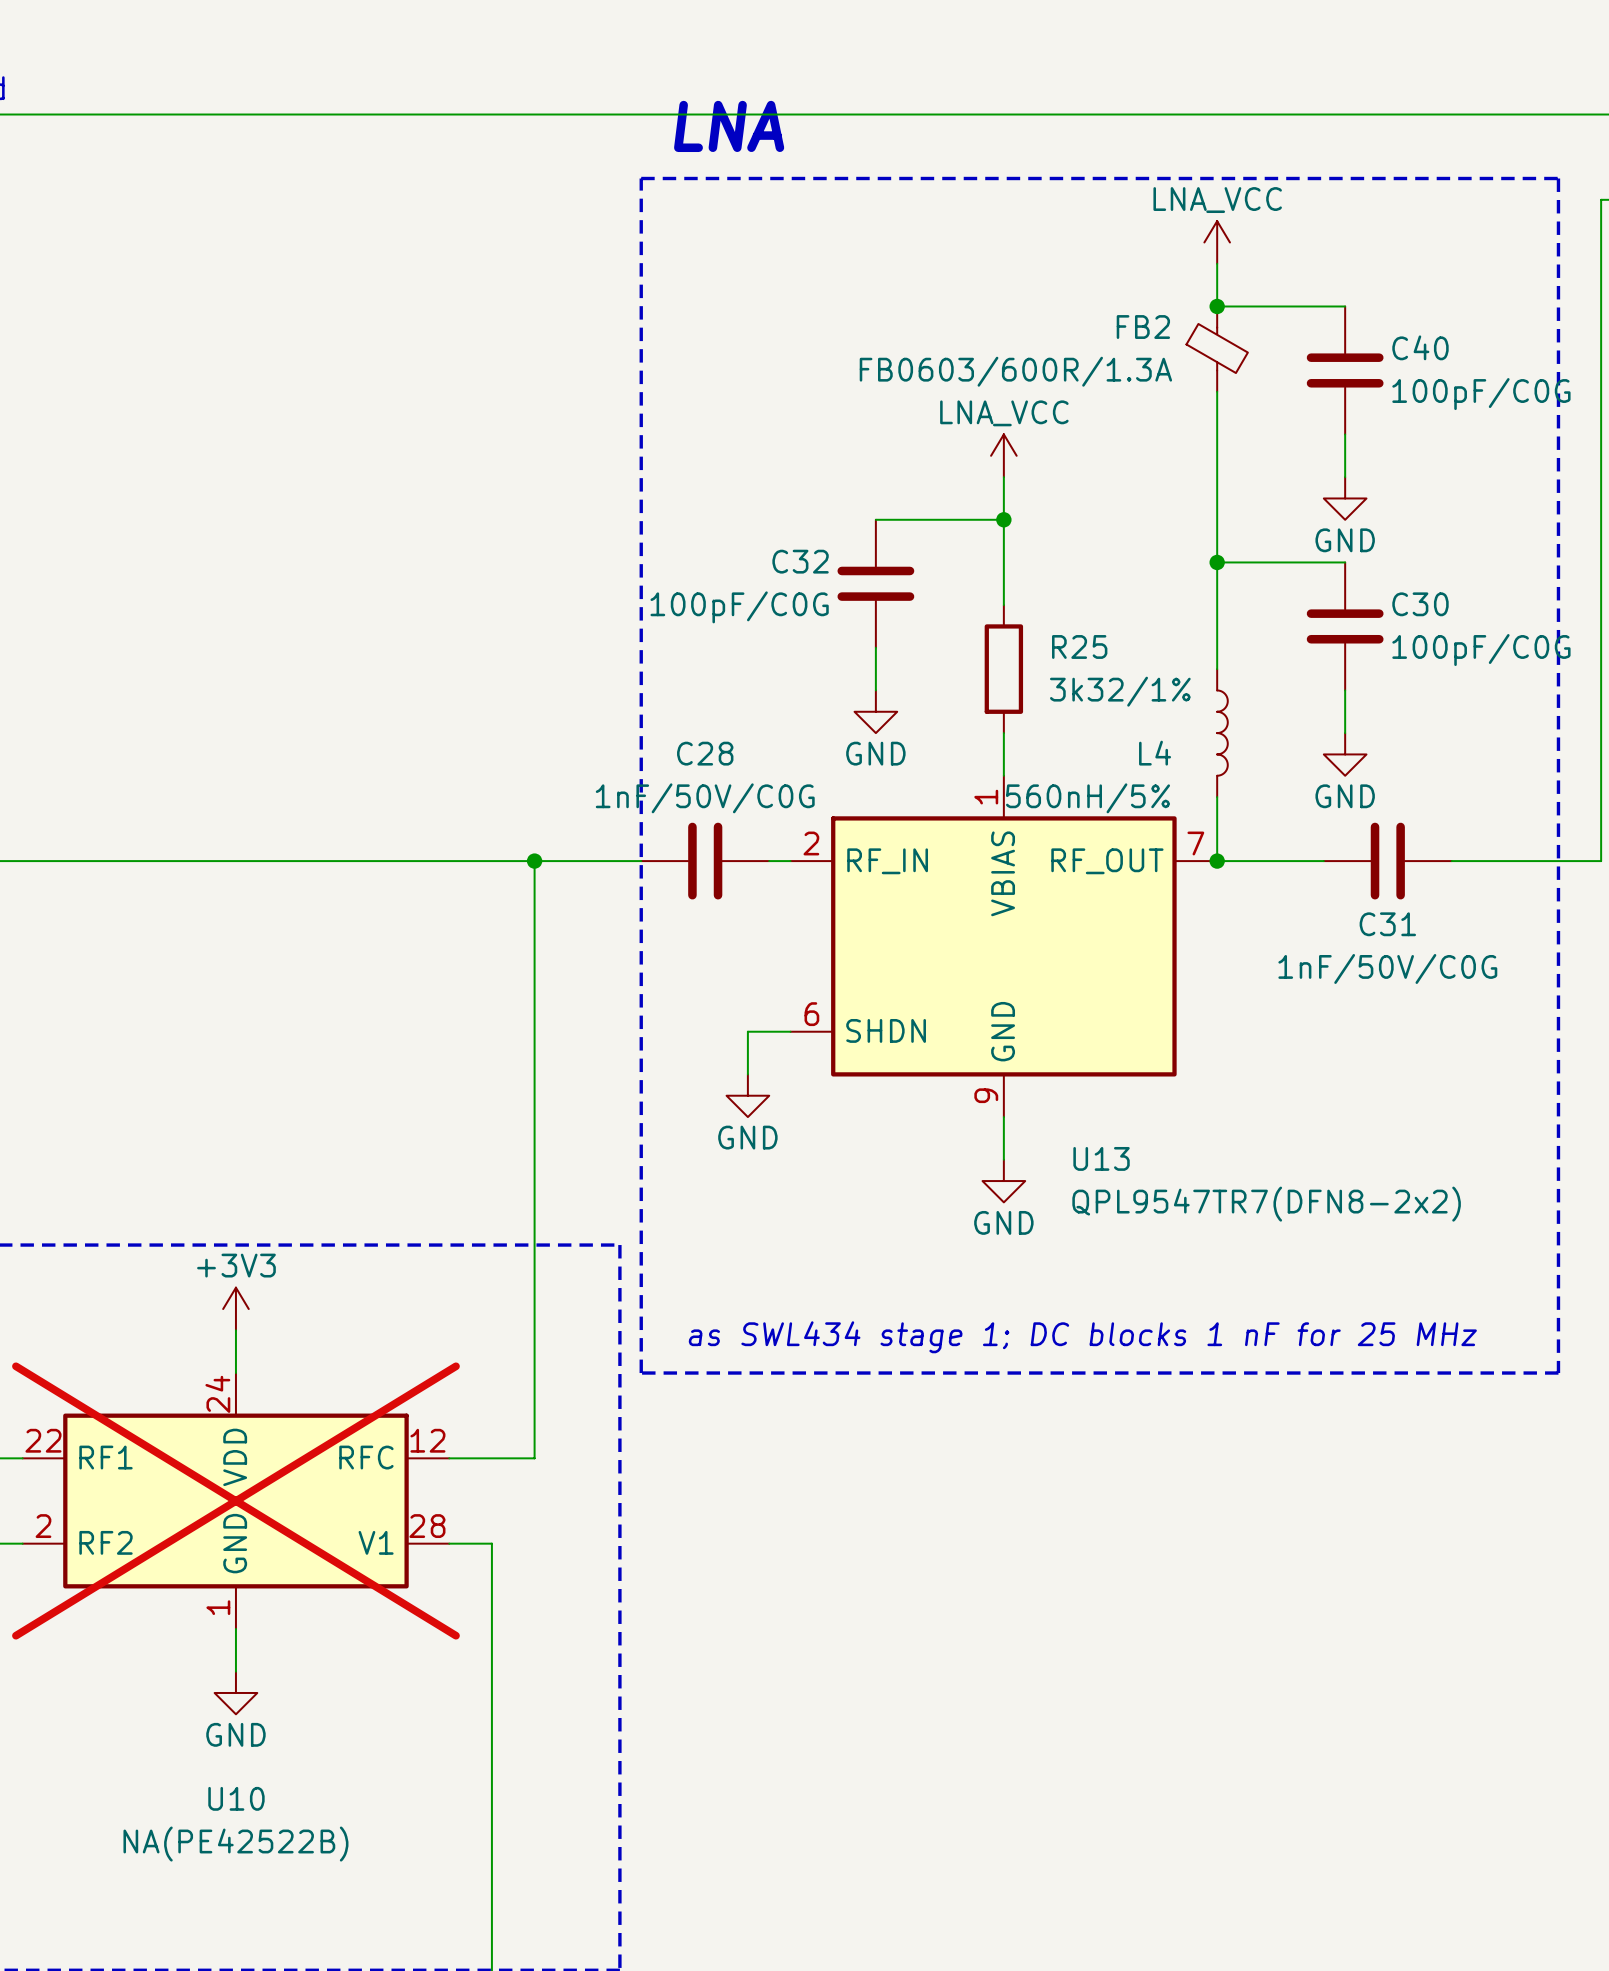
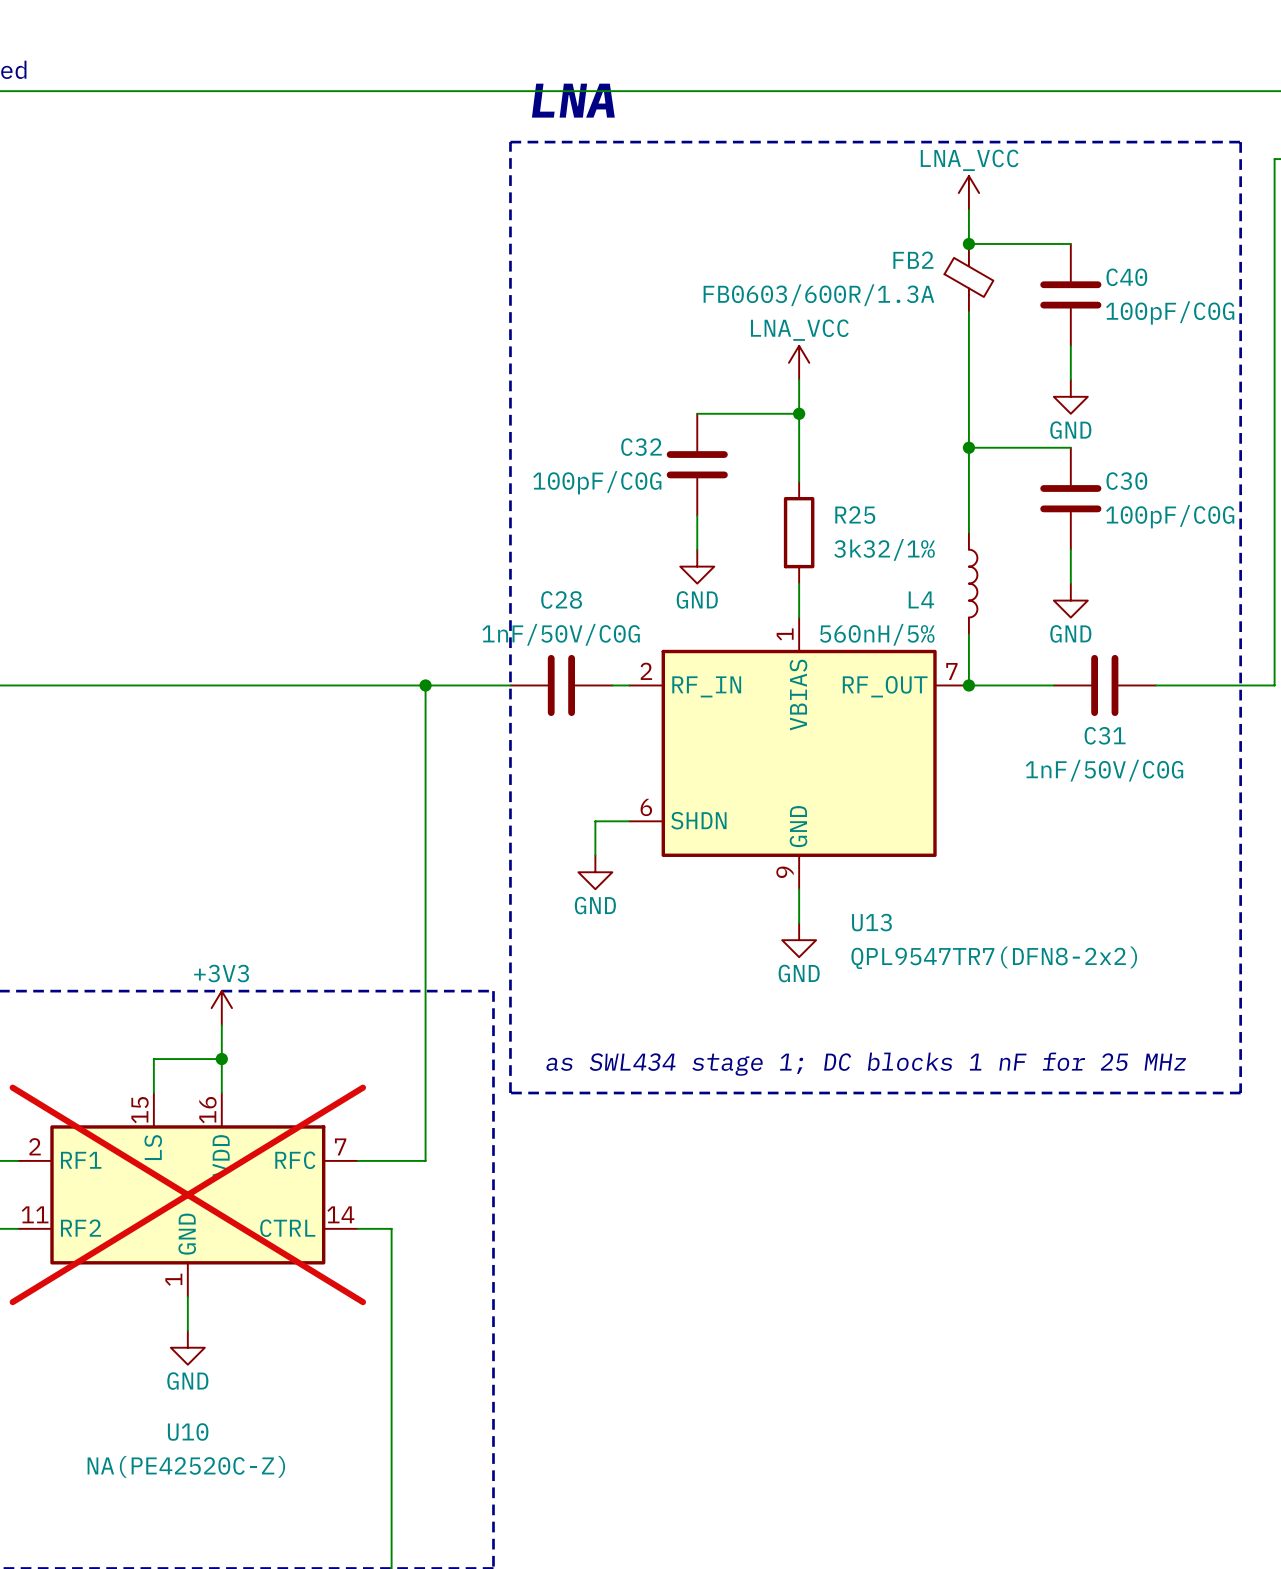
wire: none -> (221, 1025) (221, 1093)
power symbol position: +3V3 (235, 1309) -> +3V3 (221, 1008)
wire: (235, 1330) (235, 1373) -> none
wire: none -> (221, 1059) (153, 1059) (153, 1093)
junction: none -> (221, 1059)
U10 symbol: [22, 1373, 450, 1629] -> [18, 1093, 358, 1297]
U10 value: NA(PE42522B) (235, 1844) -> NA(PE42520C-Z) (186, 1466)

